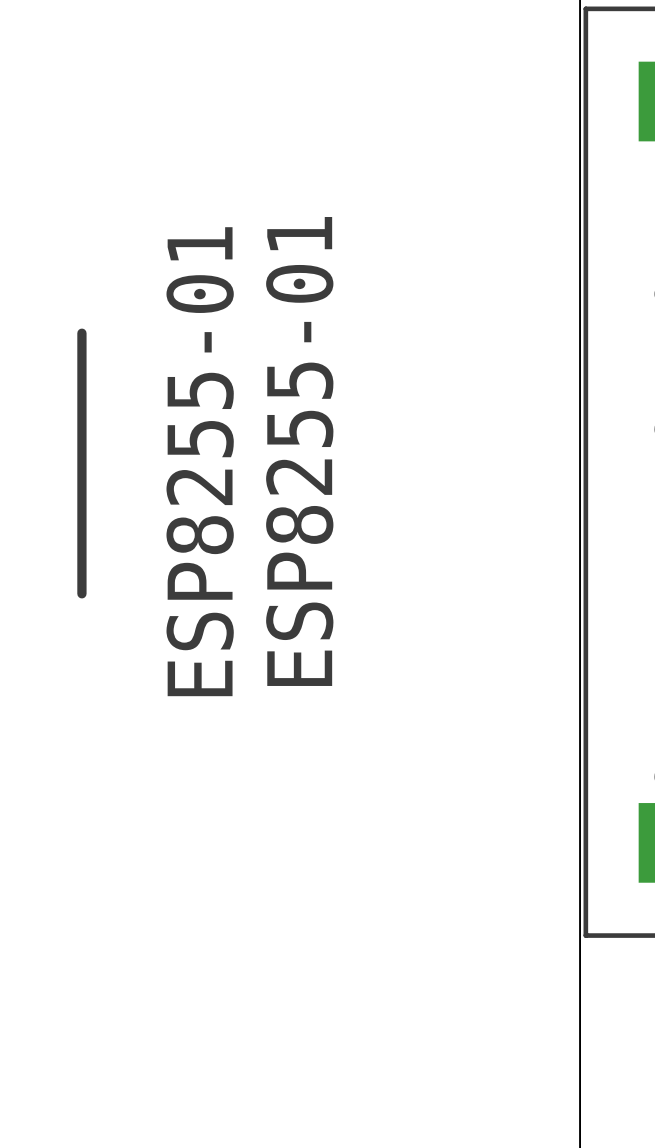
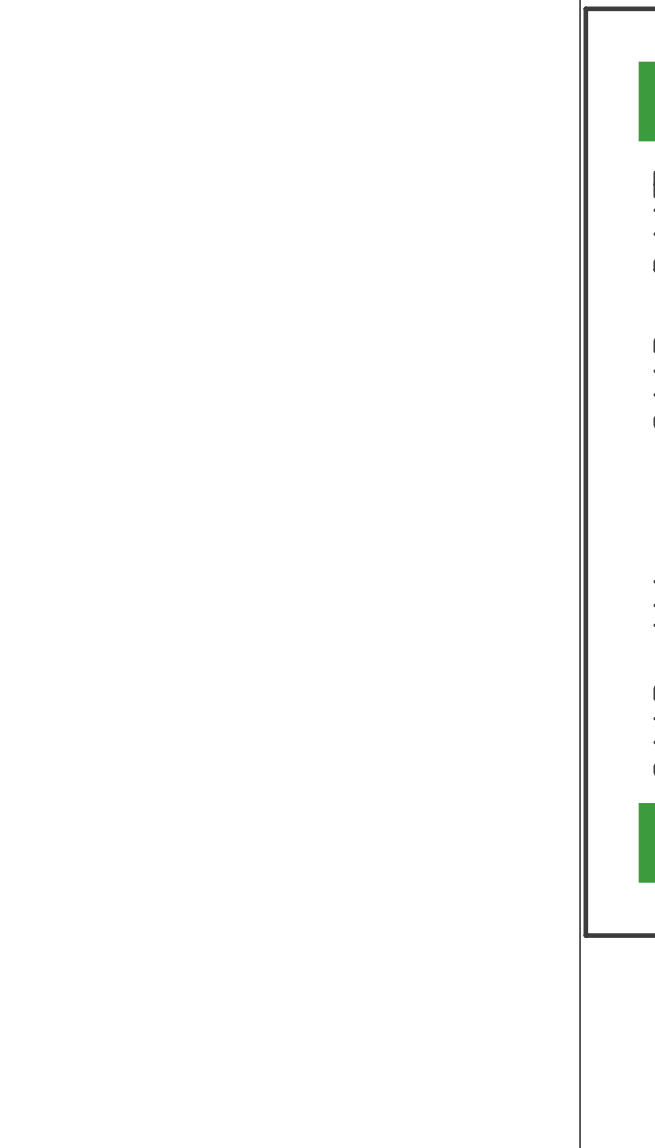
line: (81, 333) (81, 593) -> none
text: ESP8255-01 (299, 451) -> none
text: ESP8255-01 (200, 461) -> none

